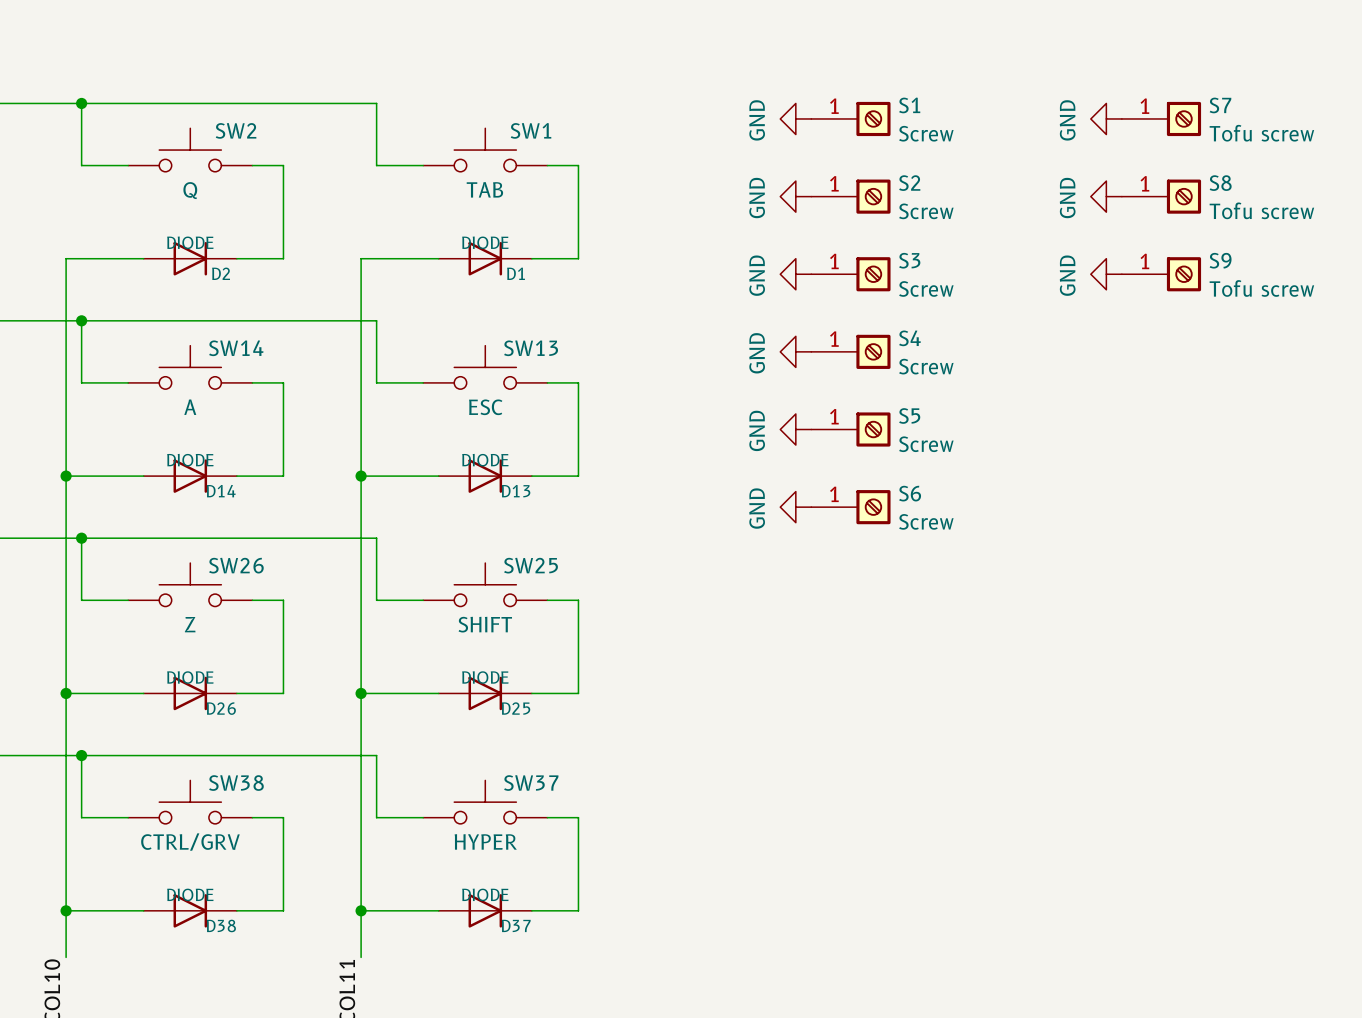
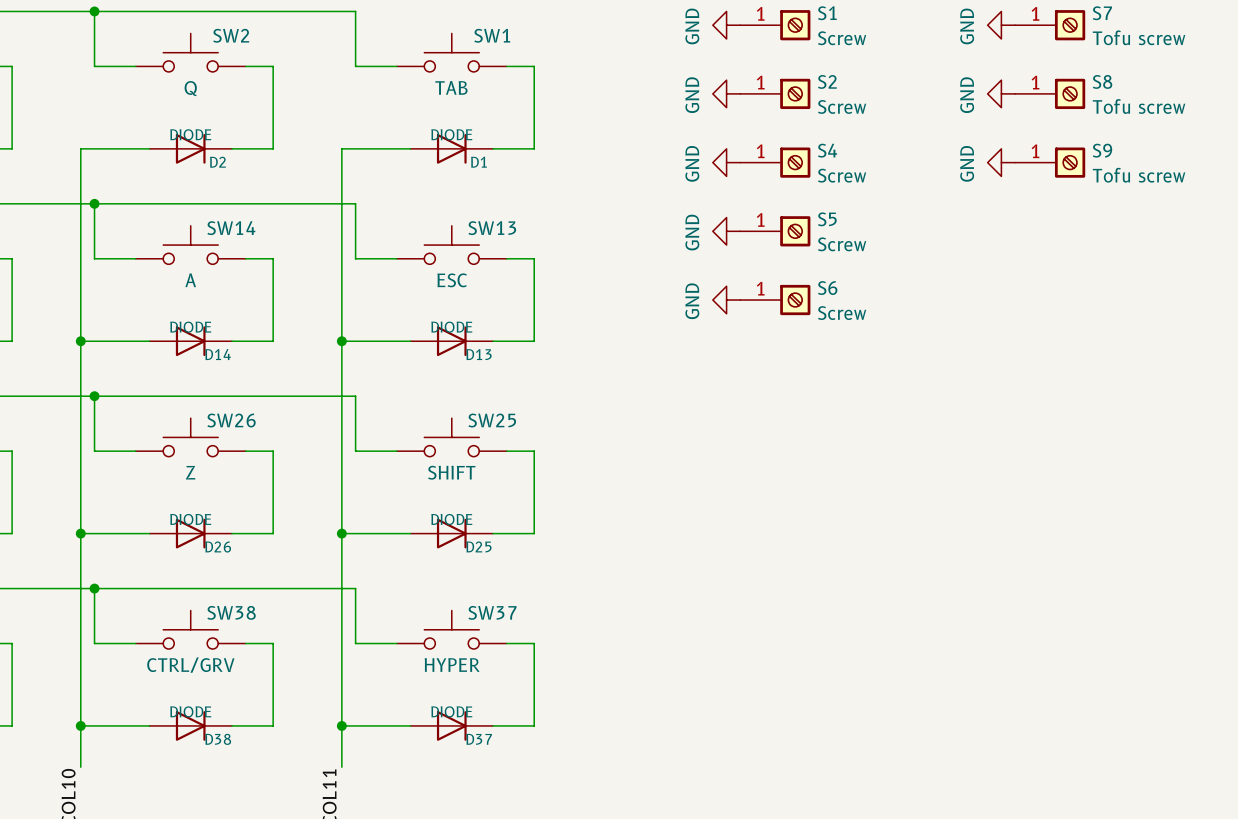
S3 name: S3 (909, 260) -> S4 (827, 150)
S4 name: S4 (909, 338) -> S5 (827, 219)
S5 name: S5 (909, 415) -> S6 (827, 288)
power symbol: GND (795, 507) -> none
S6: Screw (850, 507) -> none

